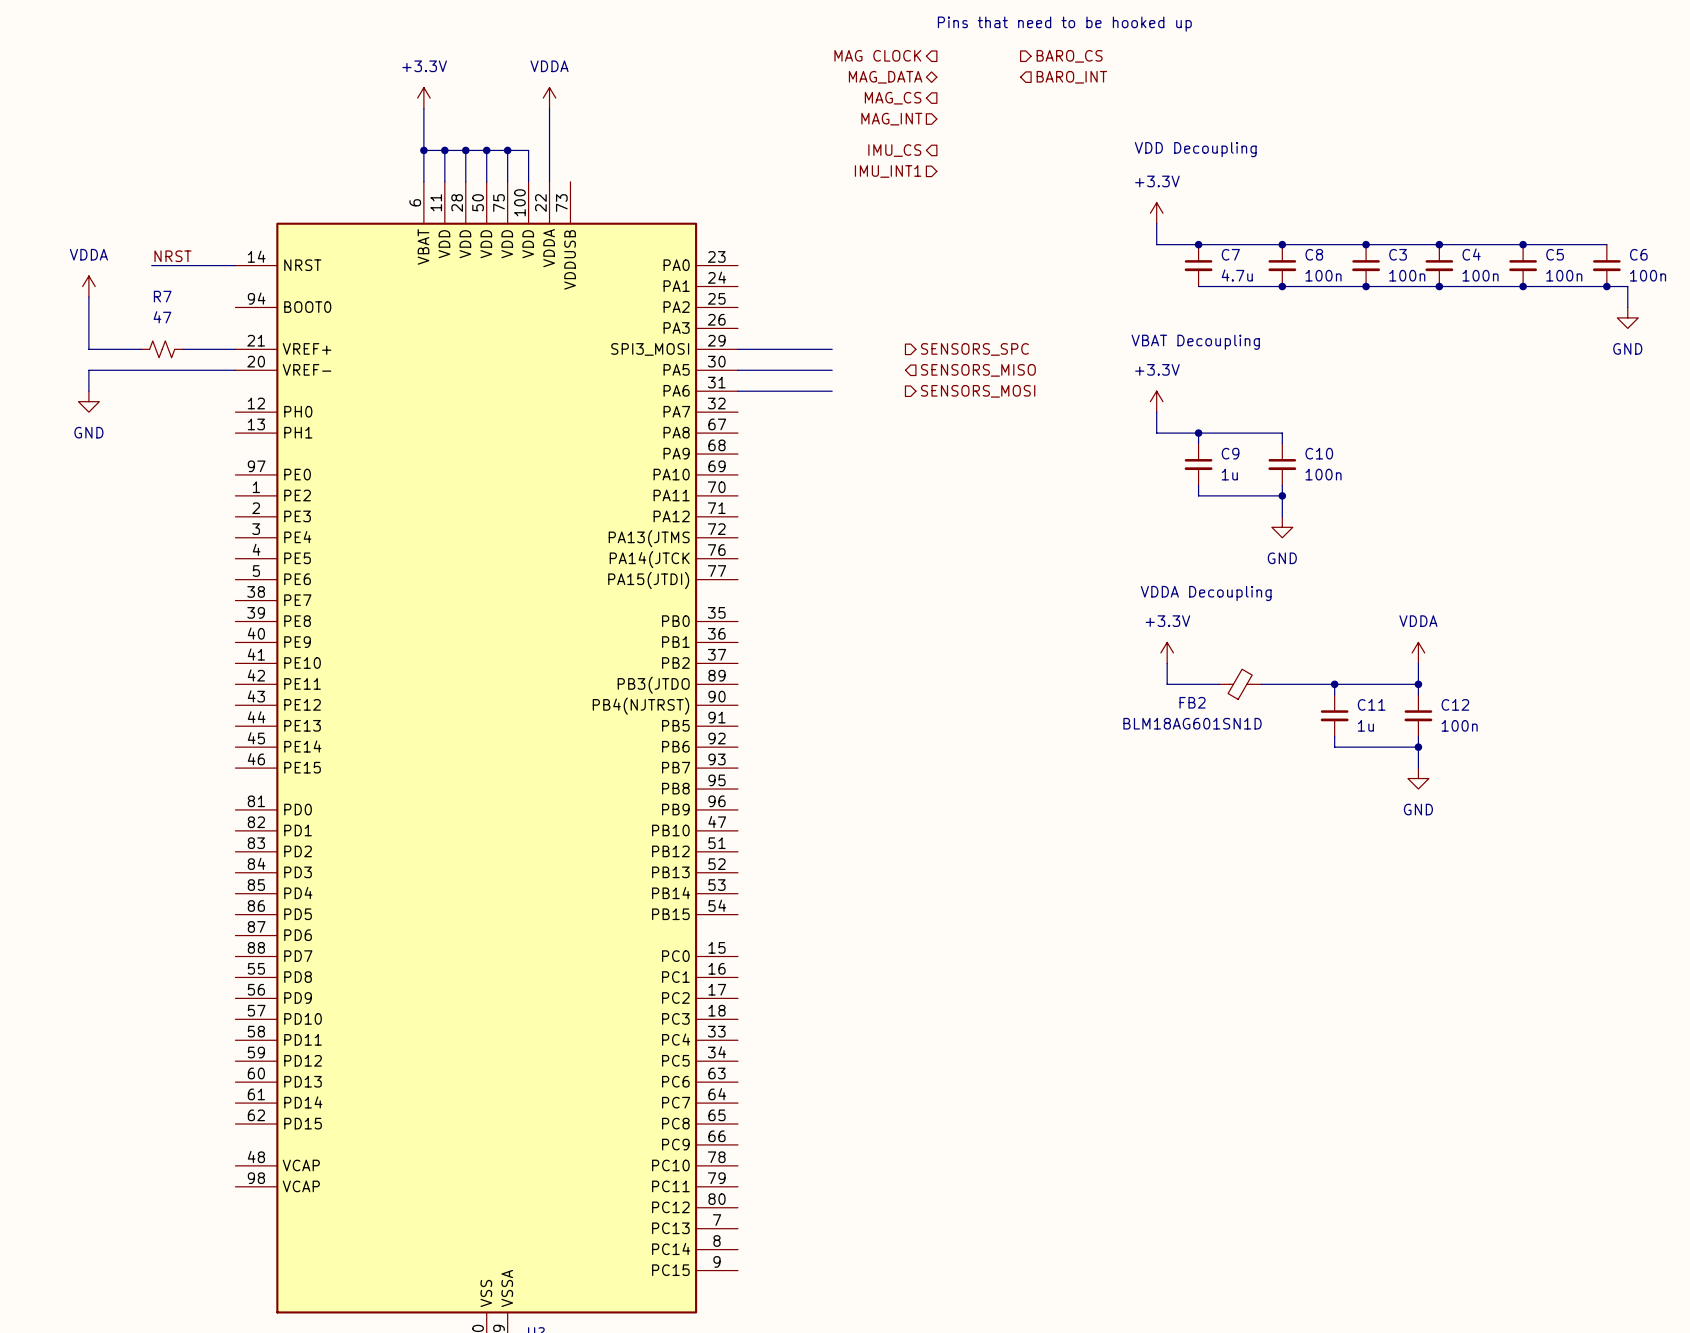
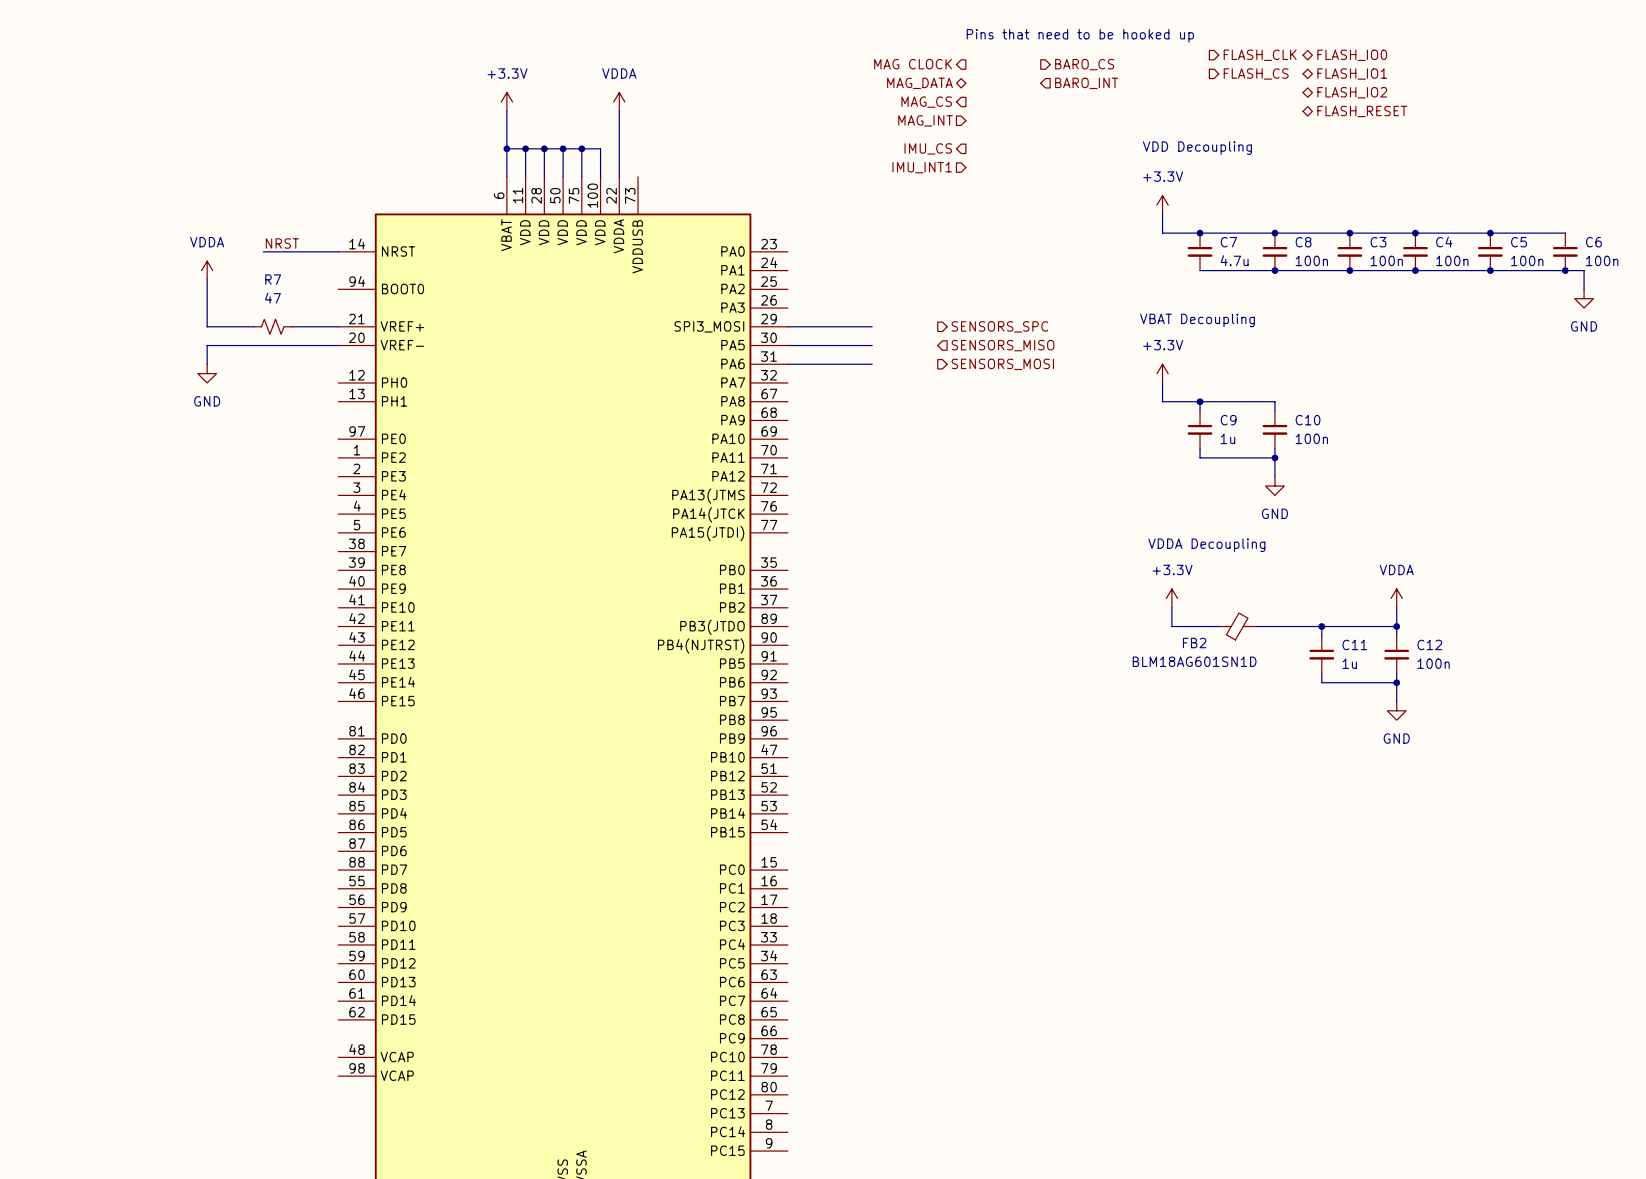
hierarchical label: none -> FLASH_CLK (1260, 55)
hierarchical label: none -> FLASH_IO0 (1352, 55)
hierarchical label: none -> FLASH_CS (1256, 73)
hierarchical label: none -> FLASH_IO1 (1352, 73)
hierarchical label: none -> FLASH_IO2 (1352, 92)
hierarchical label: none -> FLASH_RESET (1362, 111)

